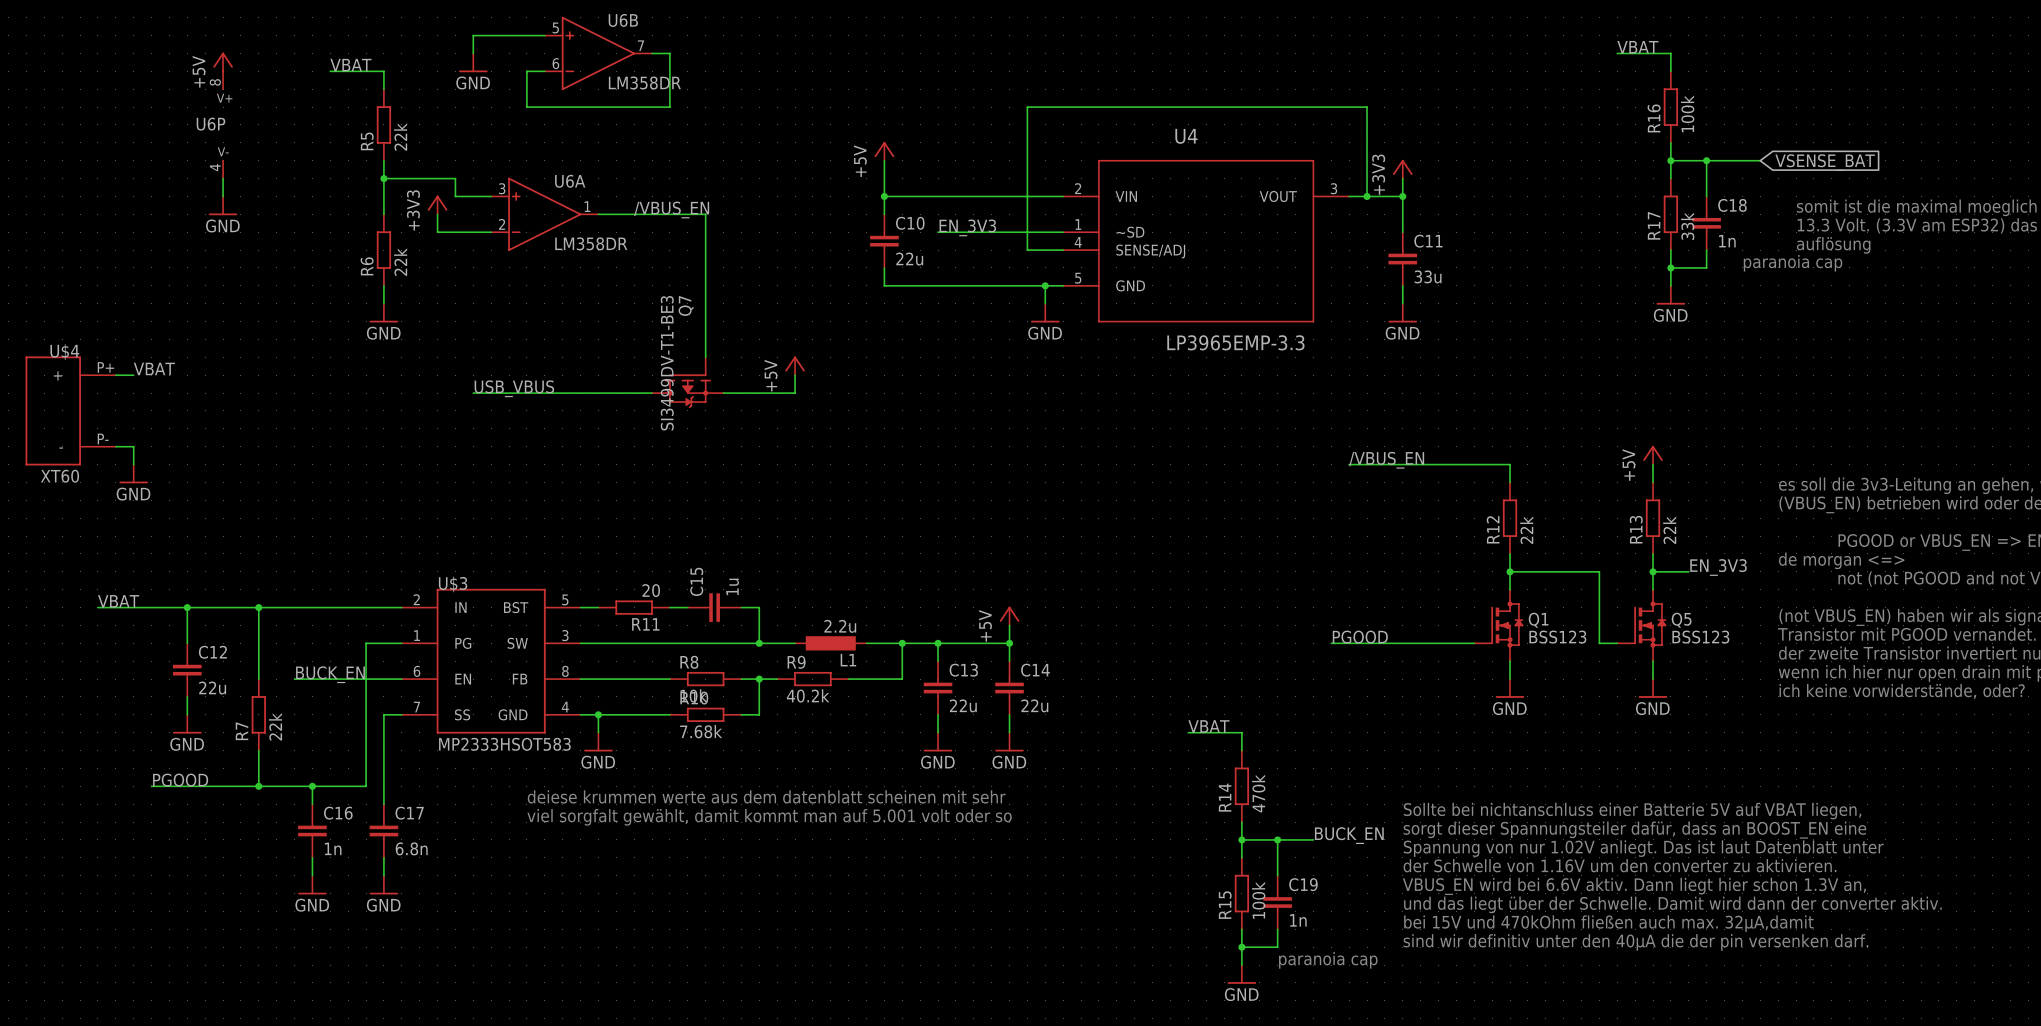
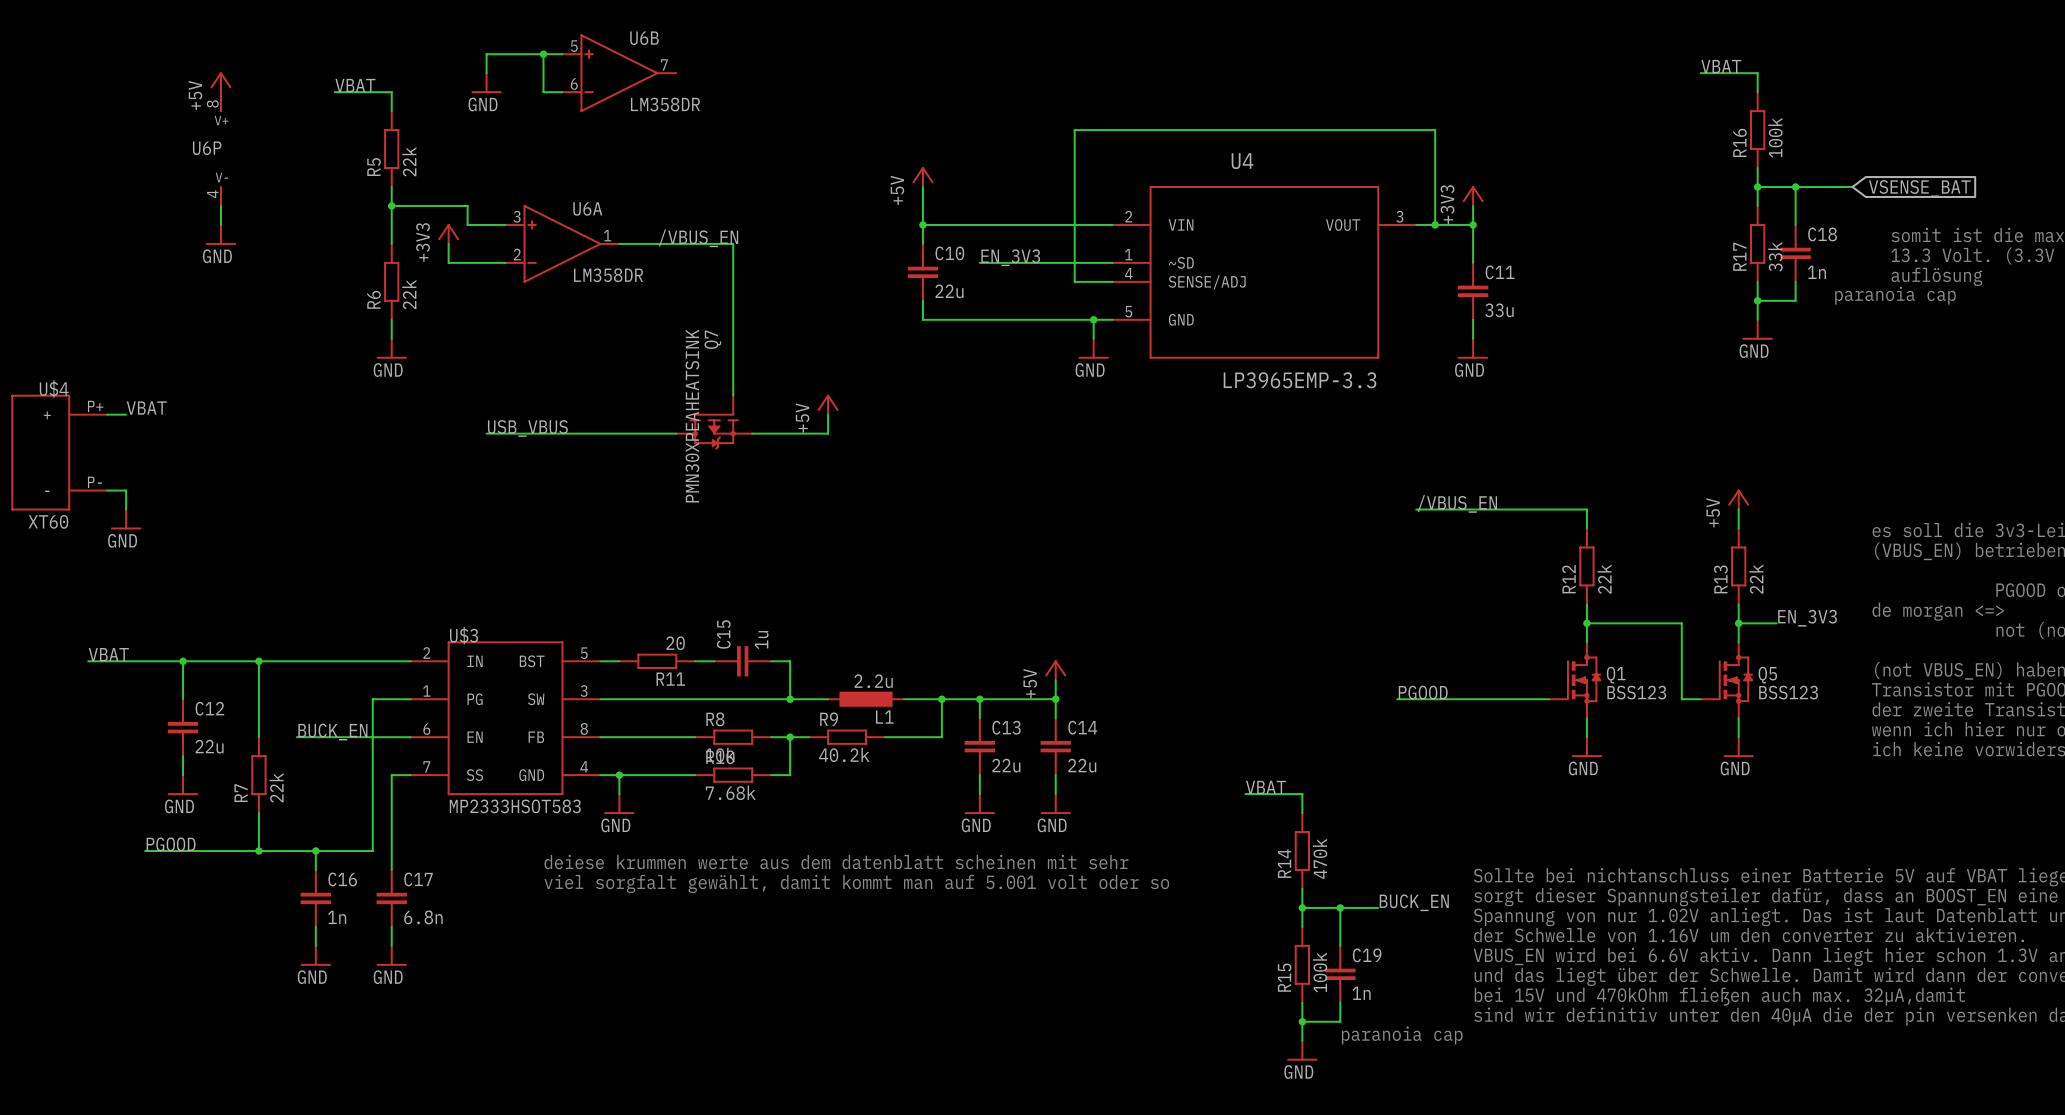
junction: none -> (543, 54)
wire: (652, 53) (669, 53) (669, 107) (526, 107) (526, 71) -> (543, 54) (543, 92)
Q7 value: SI3499DV-T1-BE3 (667, 363) -> PMN30XPEAHEATSINK (692, 416)

